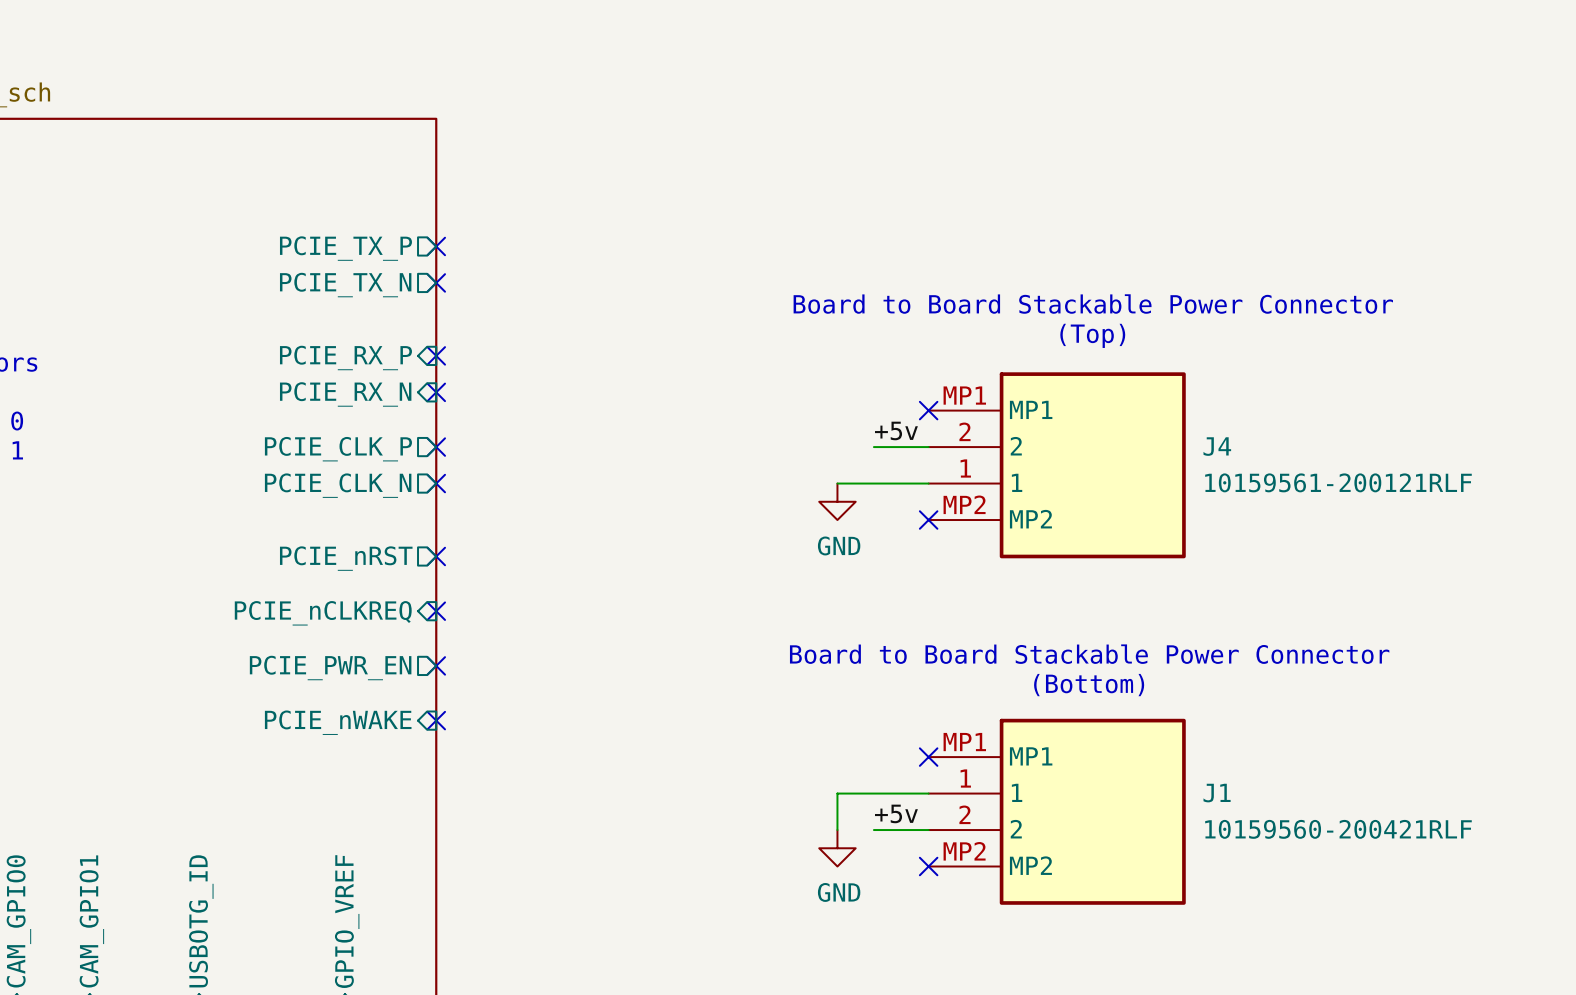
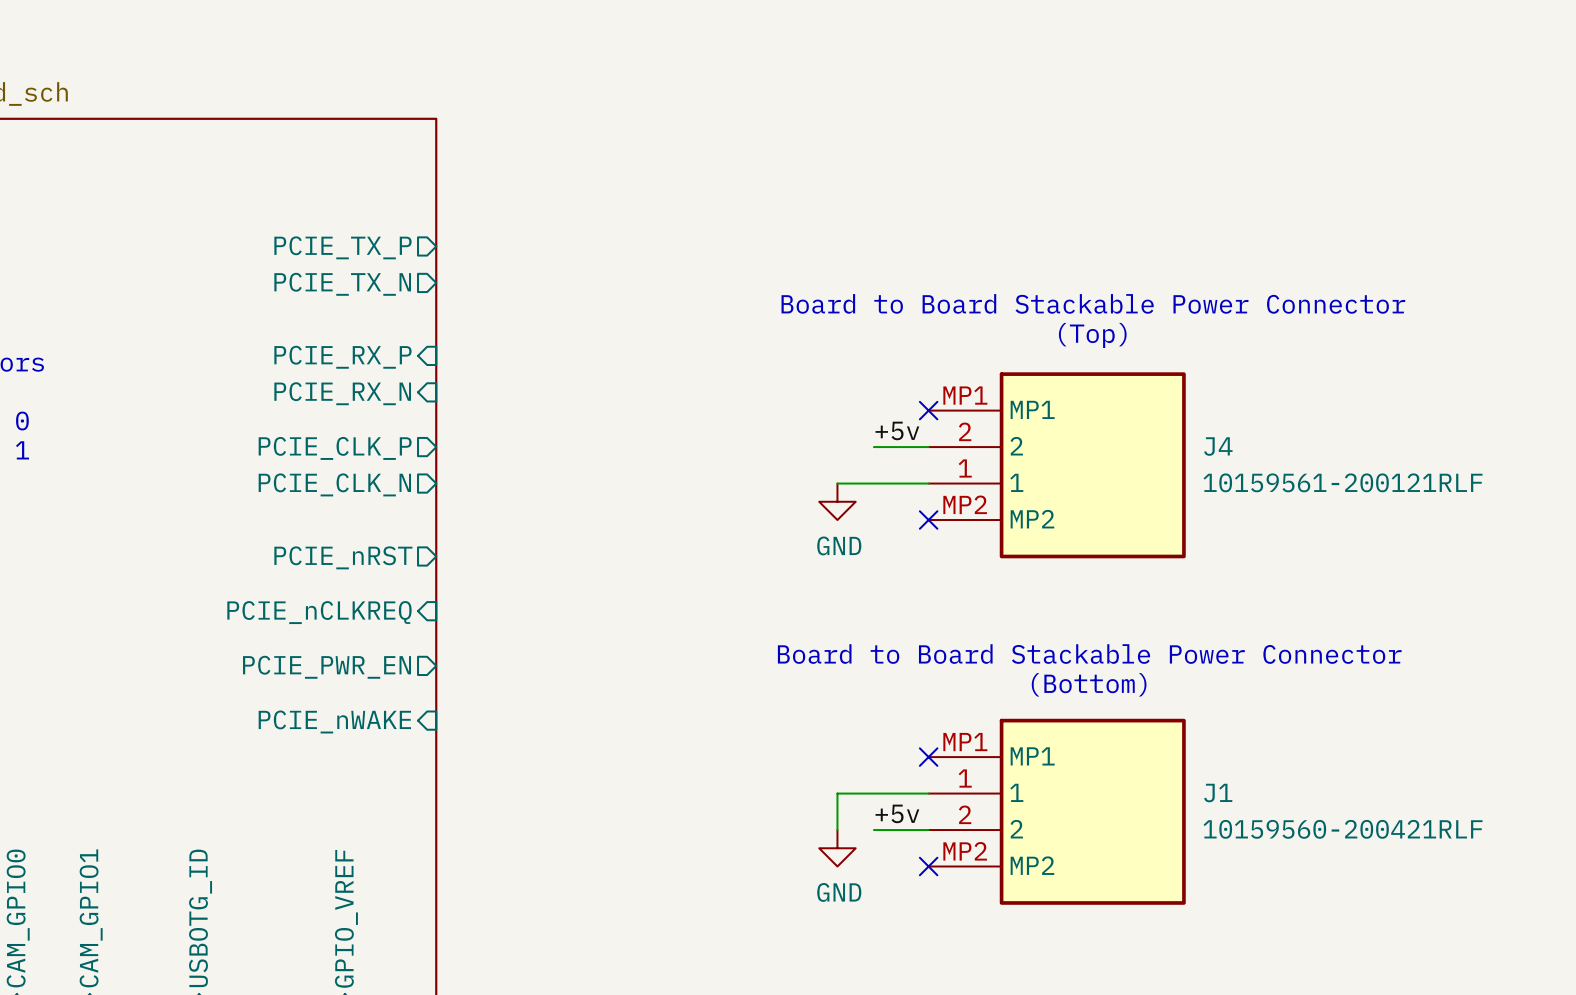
no-connect mark: (436, 246) -> none
no-connect mark: (436, 282) -> none
no-connect mark: (436, 355) -> none
no-connect mark: (436, 392) -> none
no-connect mark: (436, 447) -> none
no-connect mark: (436, 483) -> none
no-connect mark: (436, 556) -> none
no-connect mark: (436, 611) -> none
no-connect mark: (436, 665) -> none
no-connect mark: (436, 720) -> none

